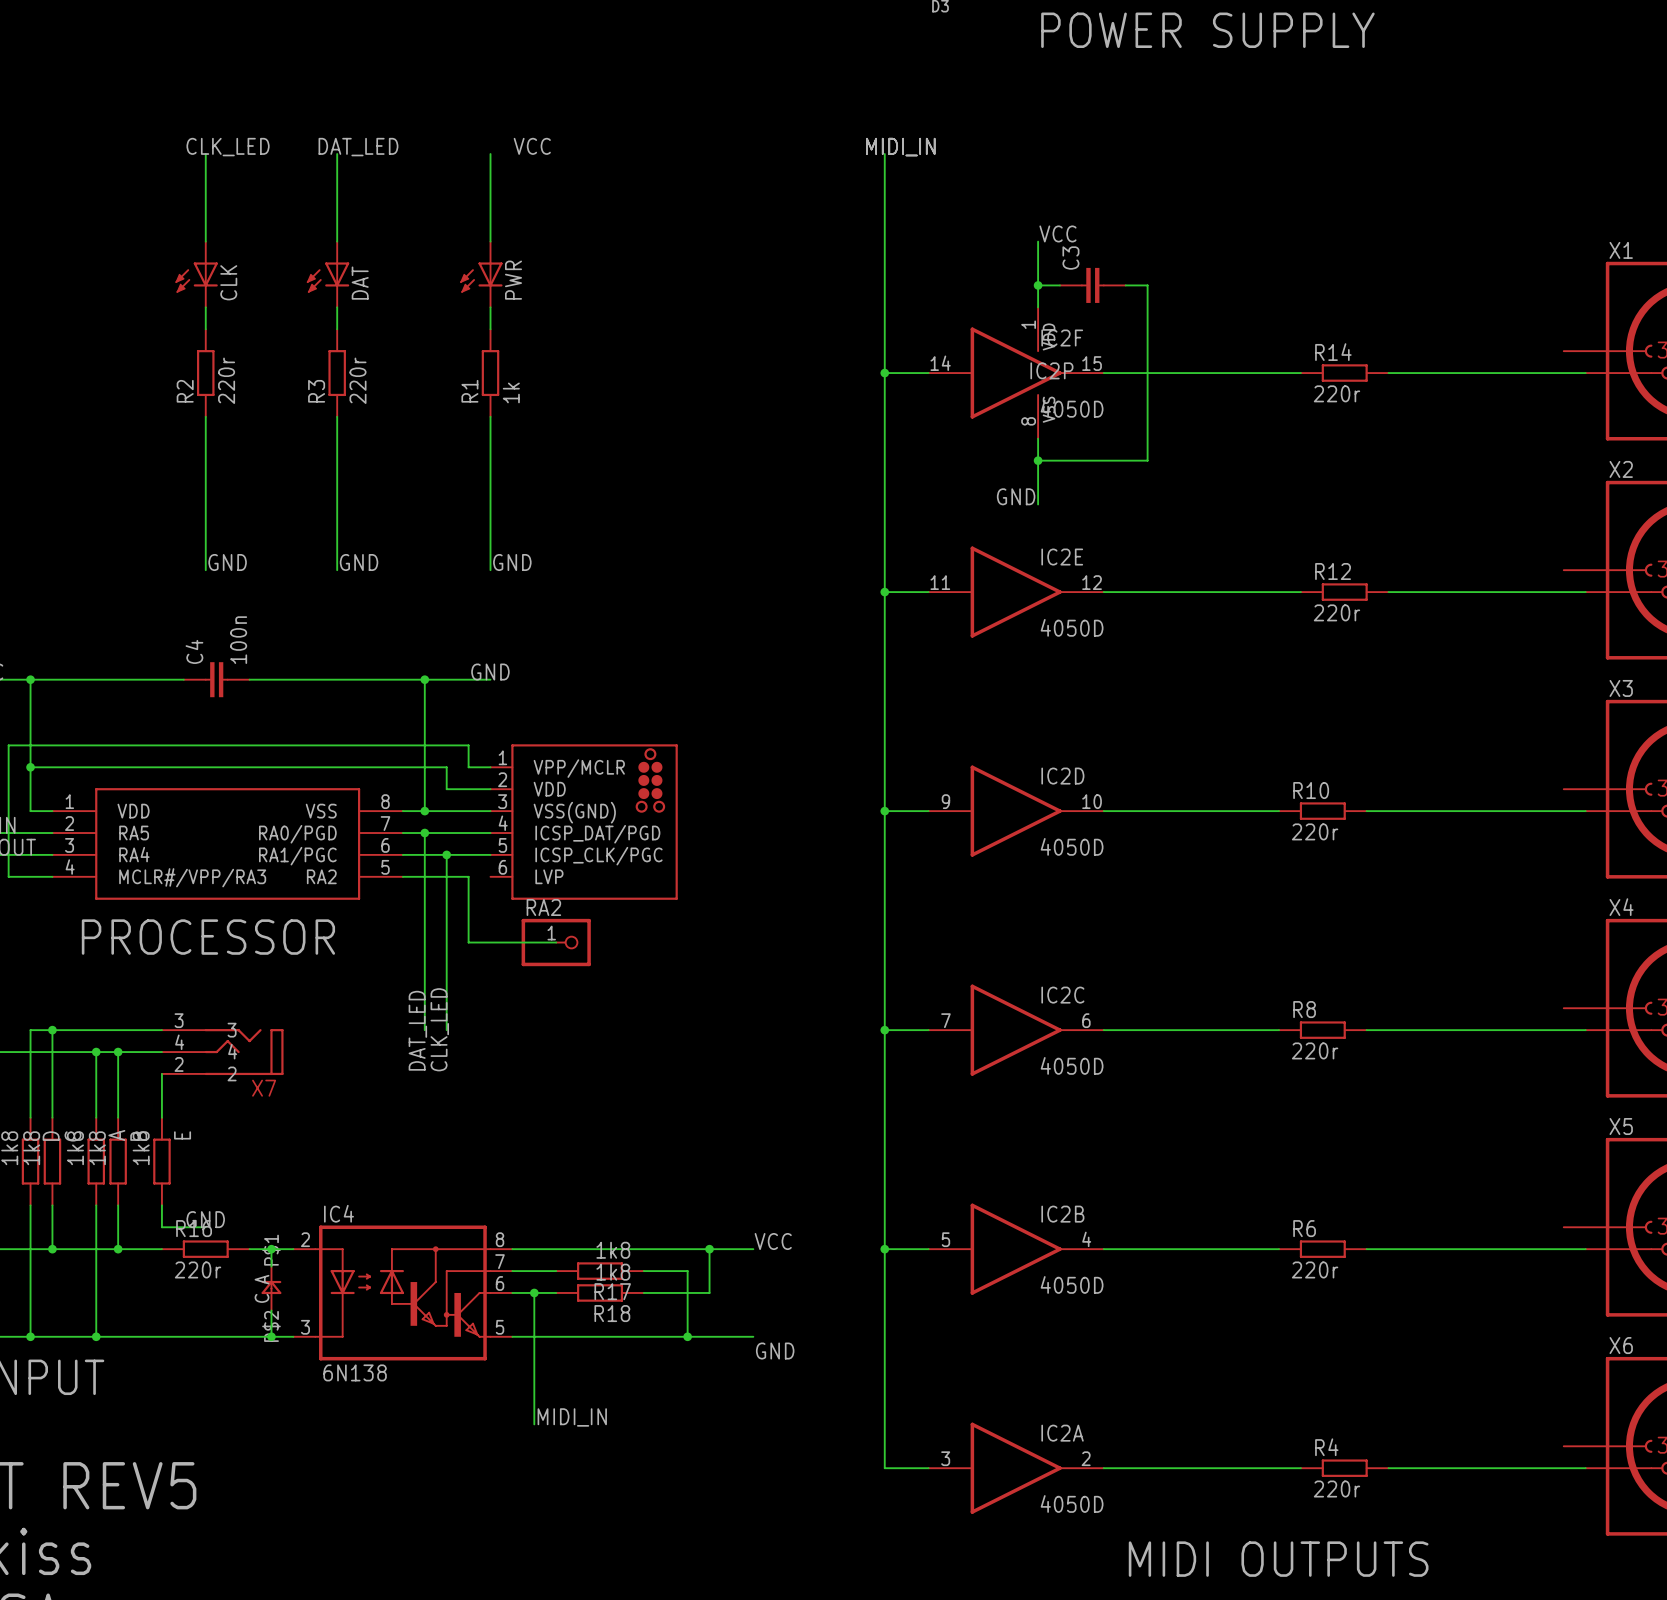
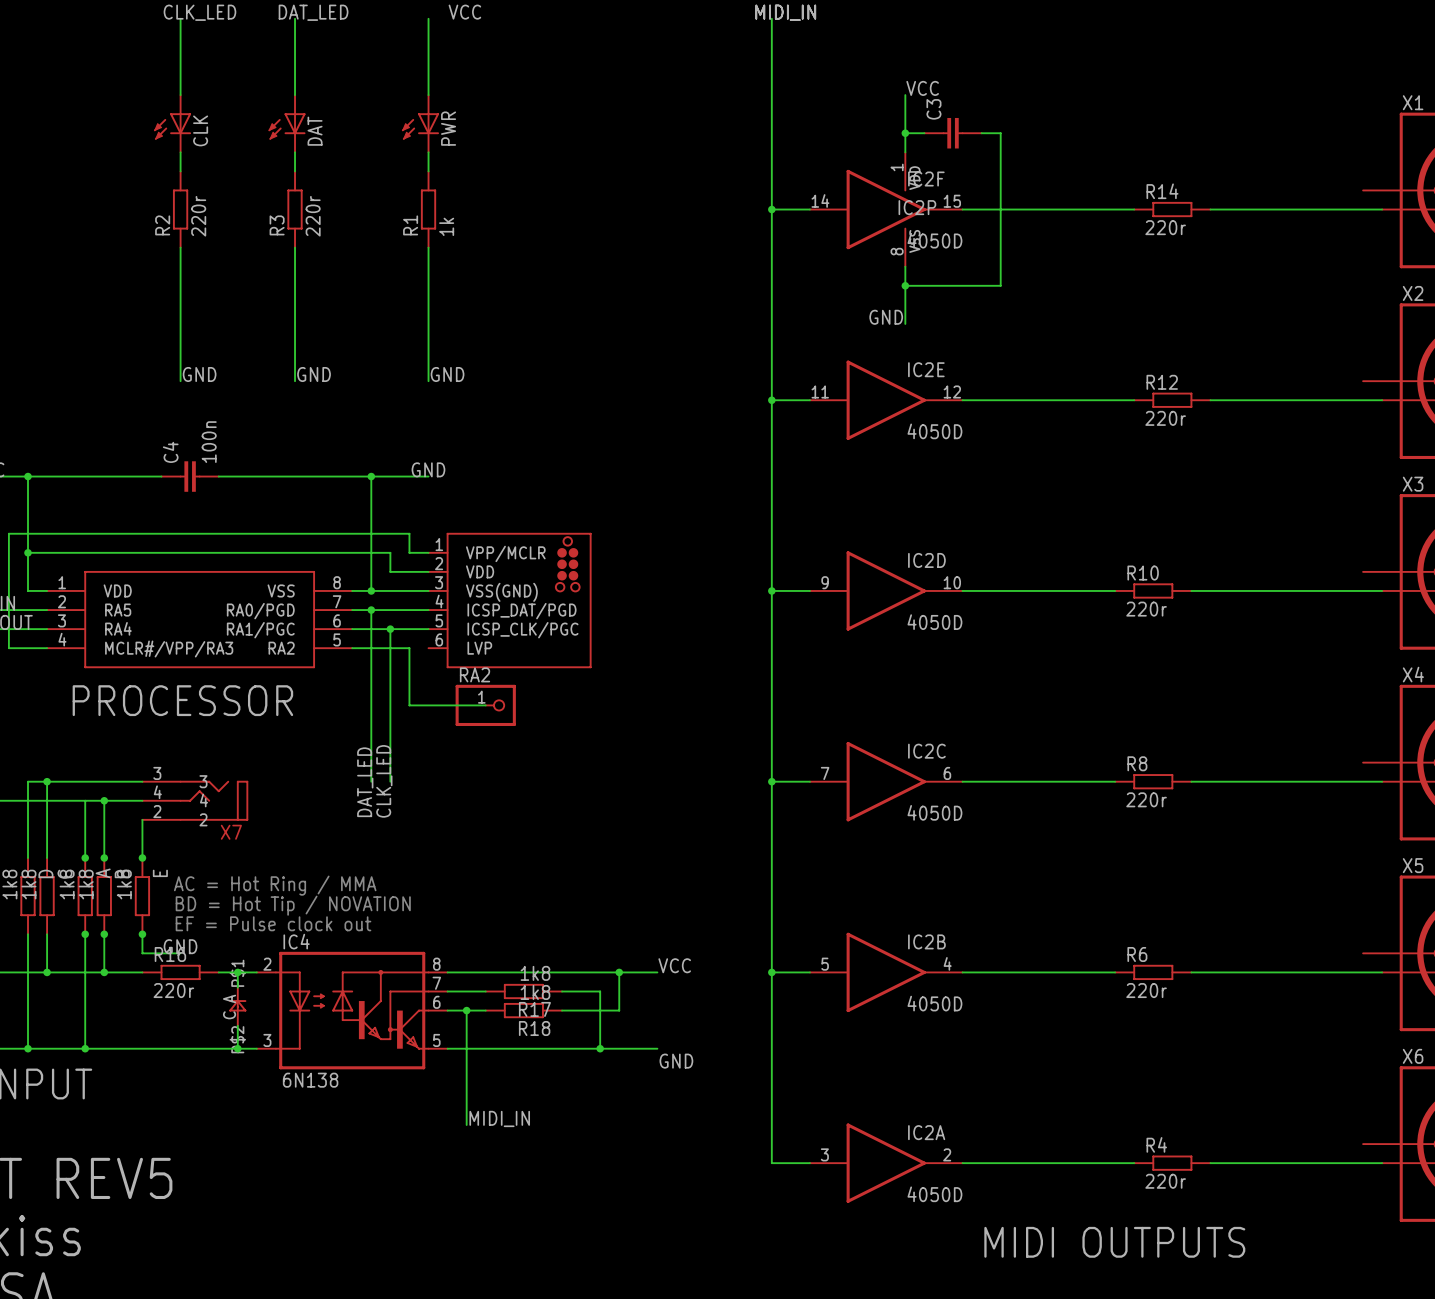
junction: (96, 1052) -> none
junction: none -> (85, 857)
junction: none -> (104, 857)
junction: none -> (142, 857)
text: none -> AC = Hot Ring / MMA (275, 885)
text: none -> BD = Hot Tip / NOVATION (293, 905)
text: none -> EF = Pulse clock out (273, 923)
junction: none -> (85, 934)
junction: none -> (104, 934)
junction: none -> (142, 934)

